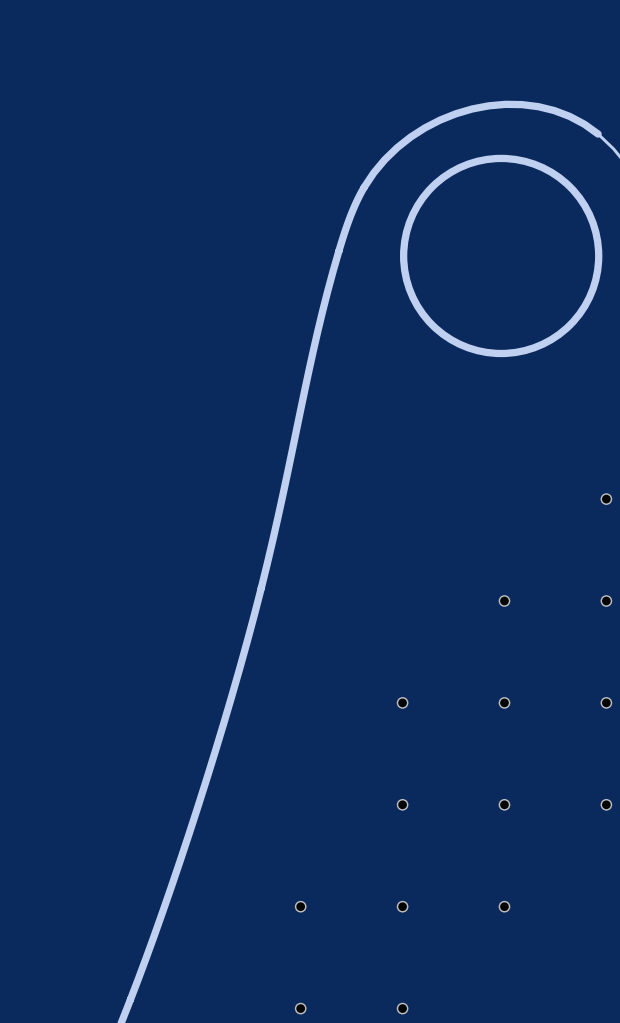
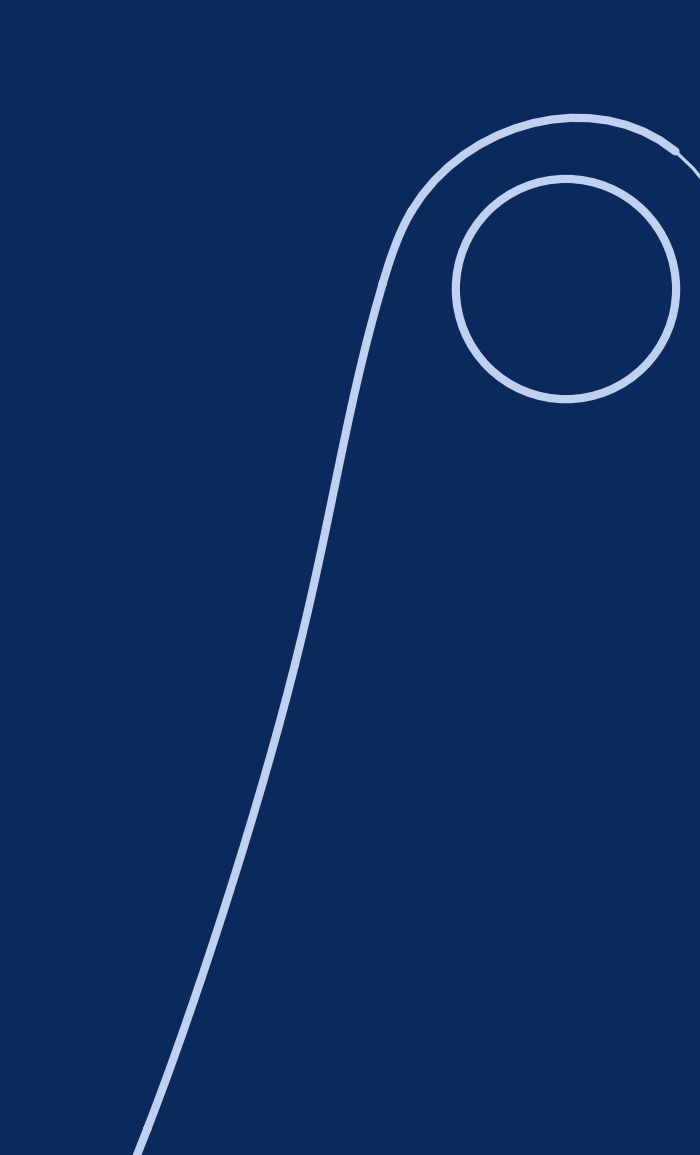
via: (606, 499) -> none
via: (504, 601) -> none
via: (606, 601) -> none
via: (402, 702) -> none
via: (504, 702) -> none
via: (606, 702) -> none
via: (402, 804) -> none
via: (504, 804) -> none
via: (606, 804) -> none
via: (300, 906) -> none
via: (402, 906) -> none
via: (504, 906) -> none
via: (300, 1008) -> none
via: (402, 1008) -> none

